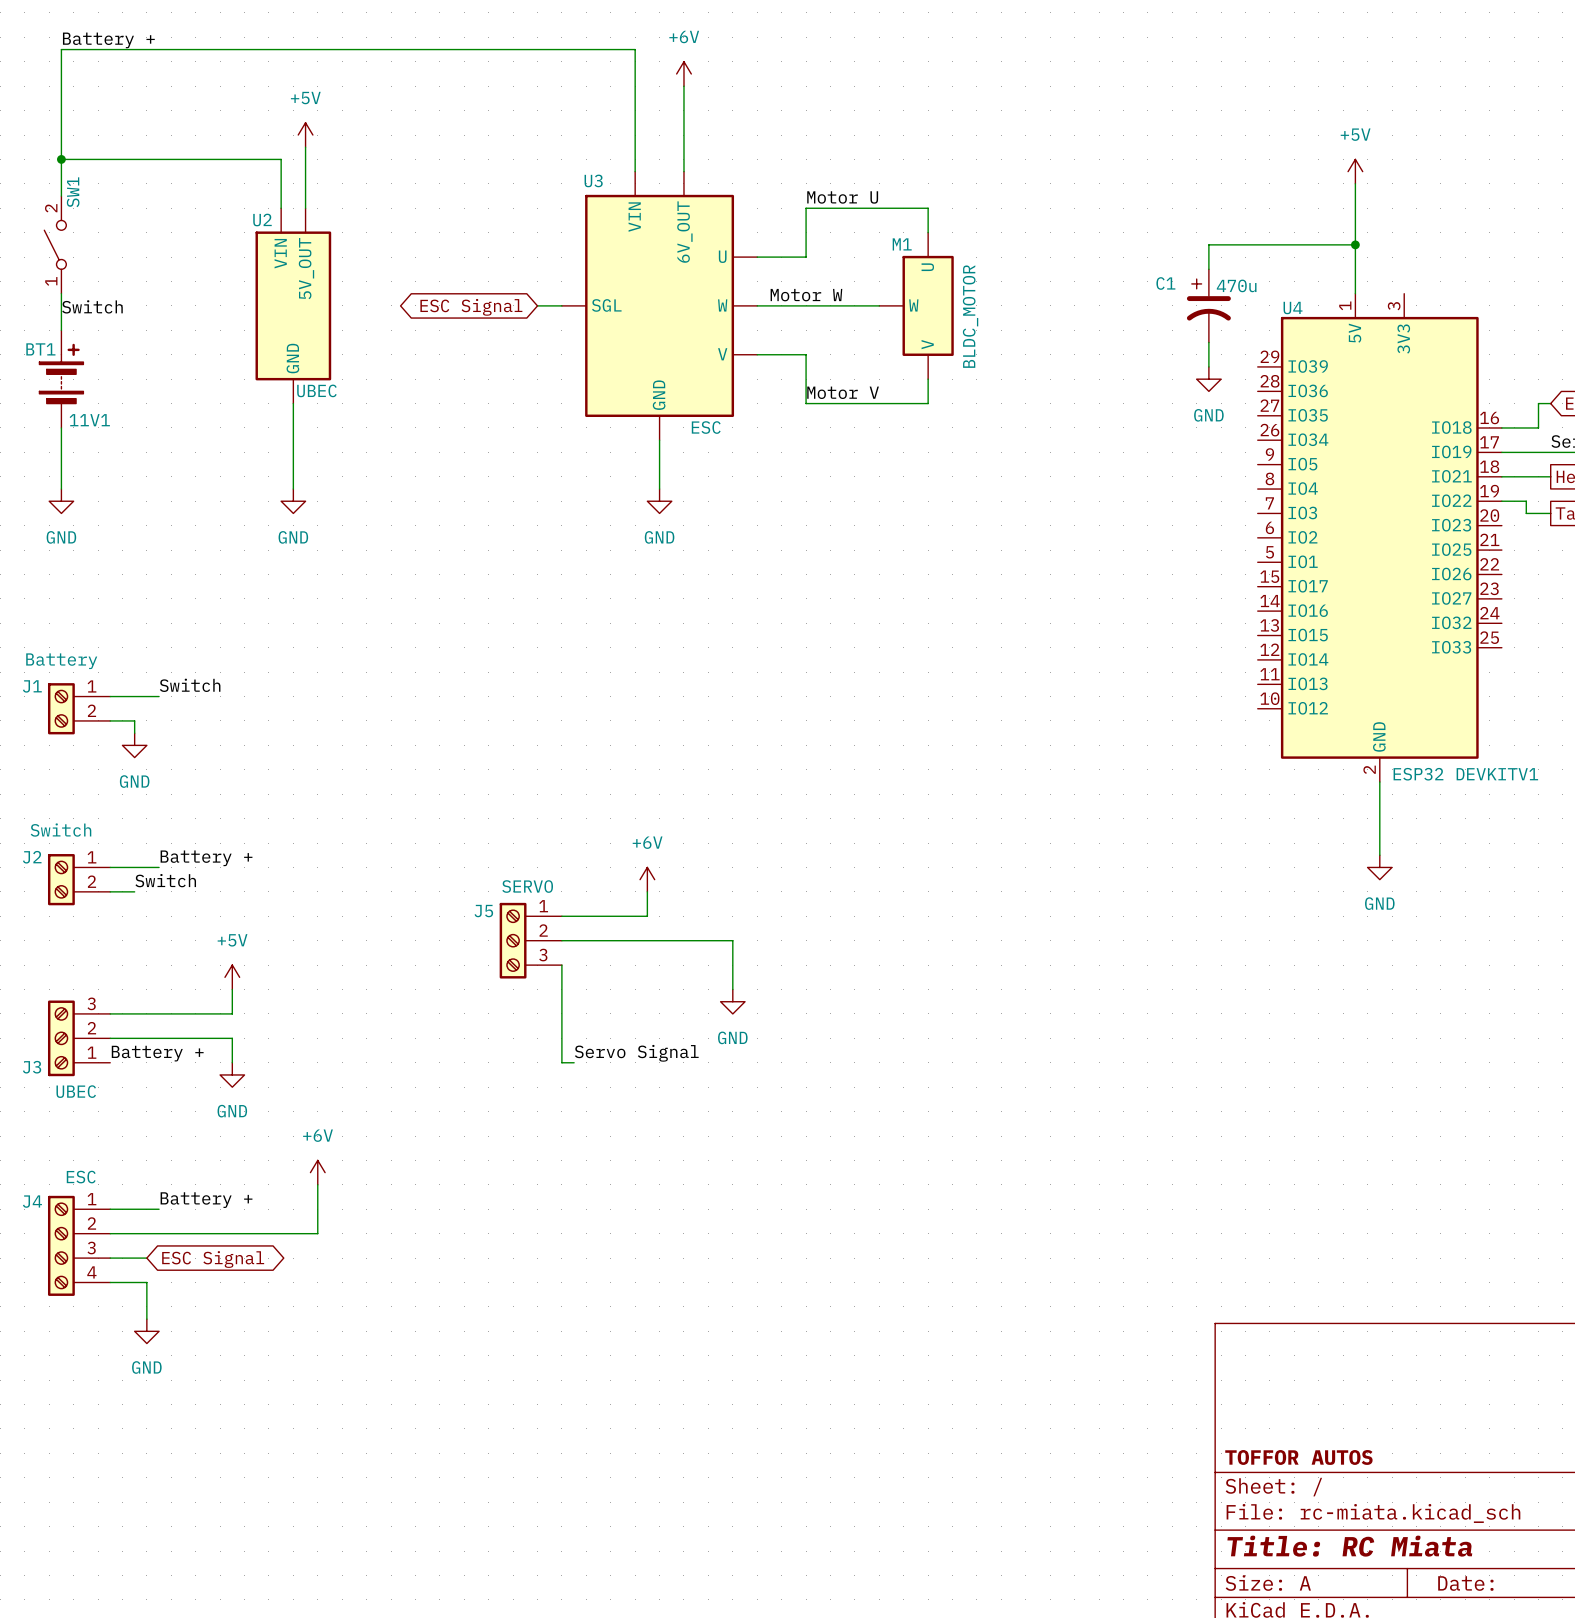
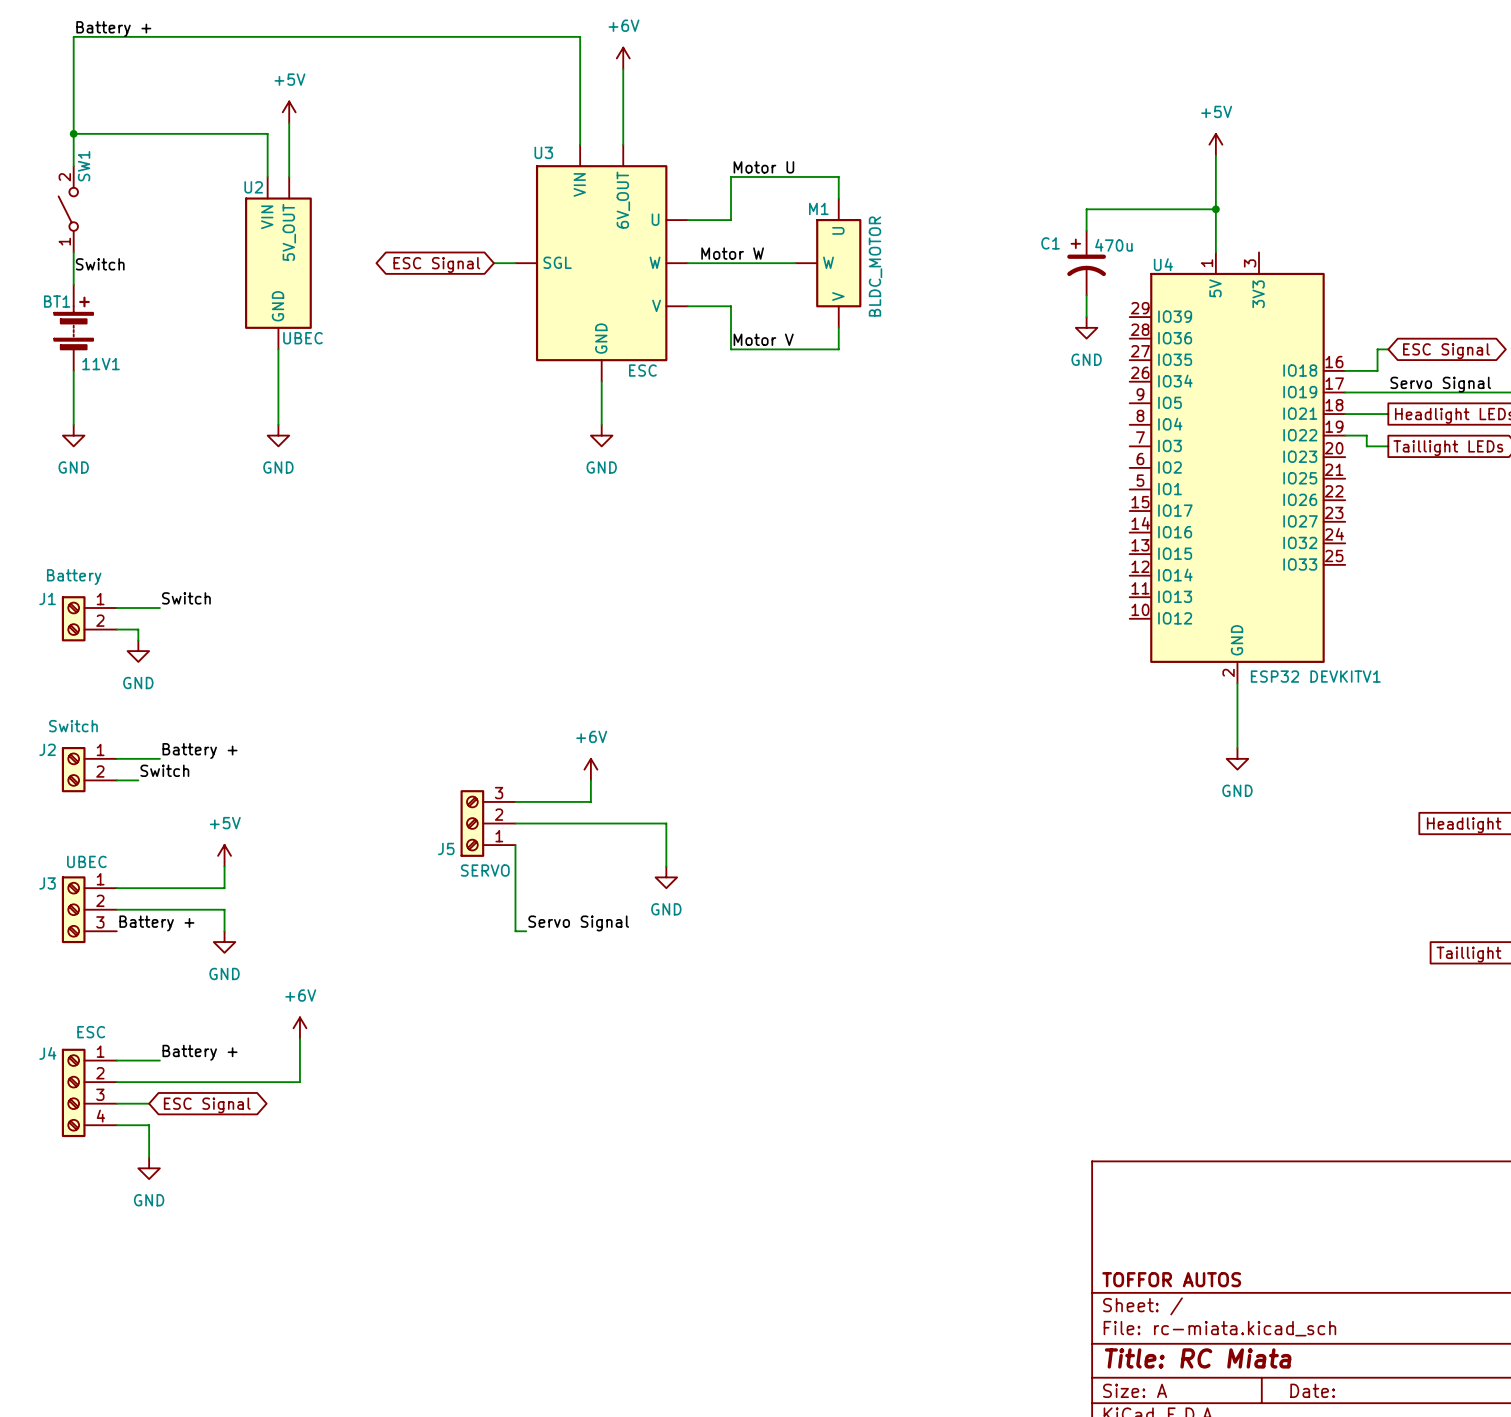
J5 flip: as is (513, 940) -> up-down (472, 823)
J3 flip: as is (61, 1038) -> up-down (73, 909)

